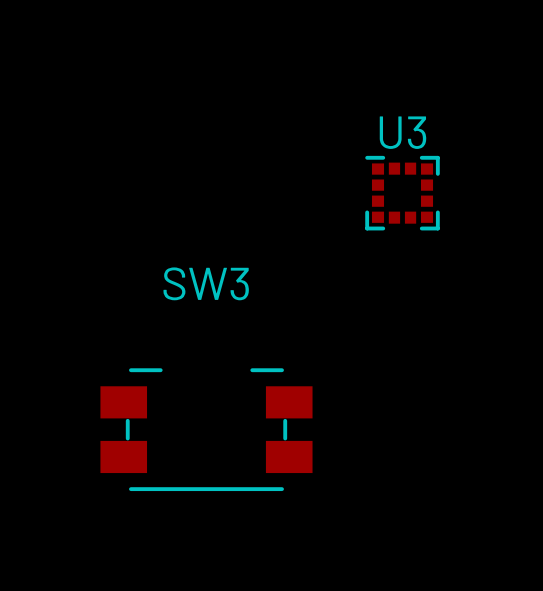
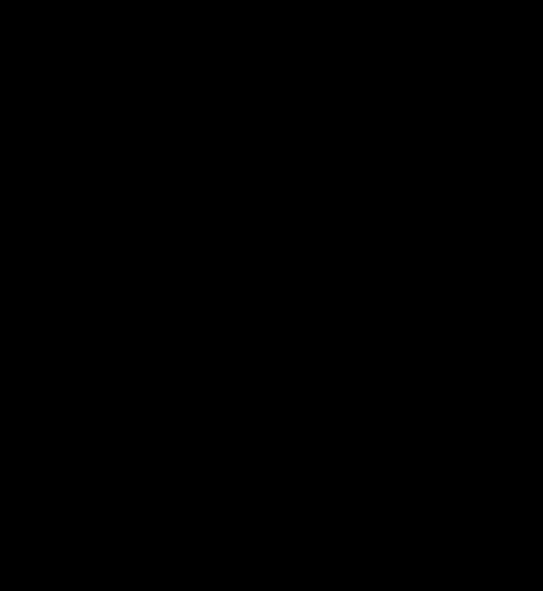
U3: (402, 193) -> none
SW3: (206, 429) -> none

